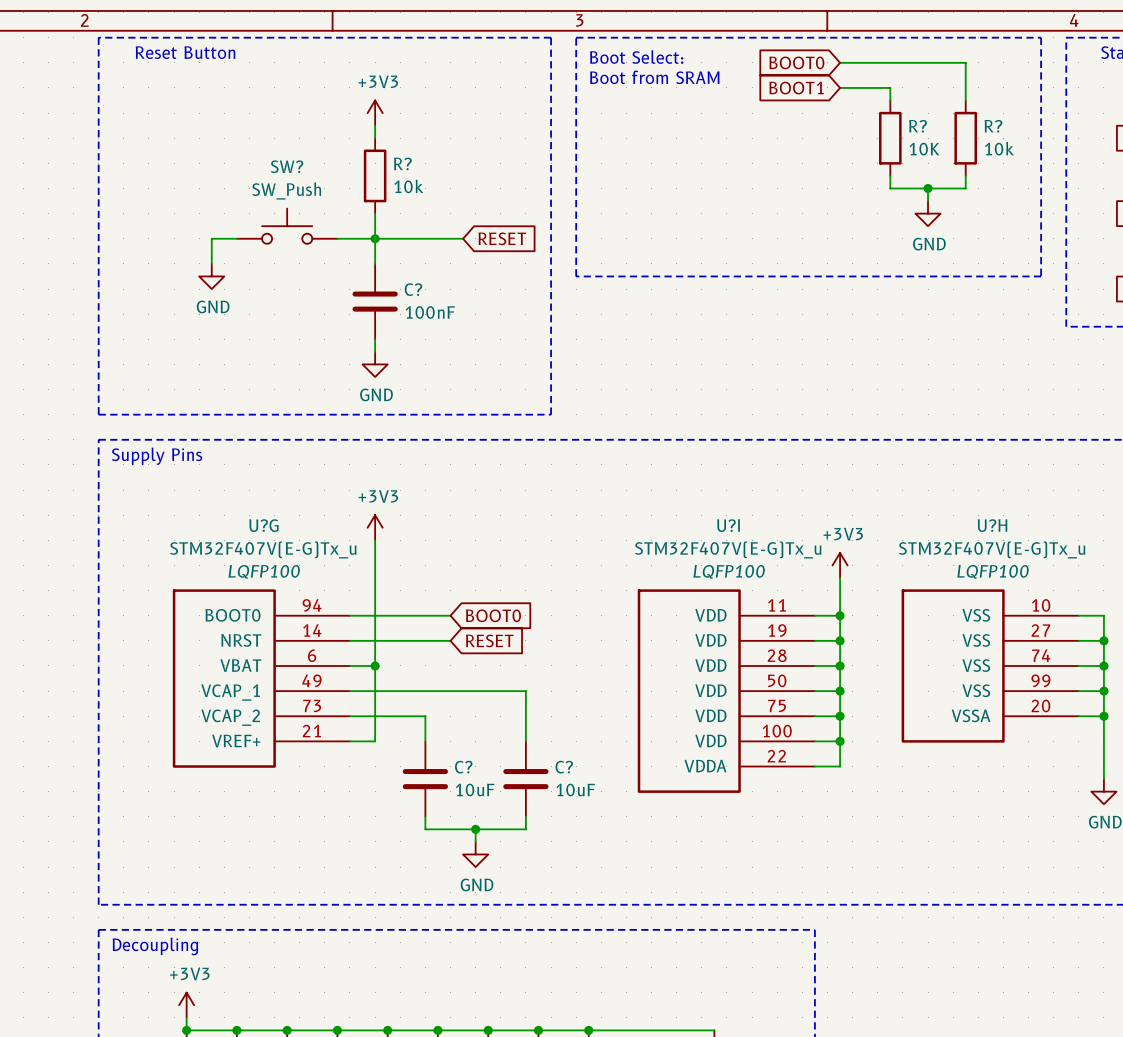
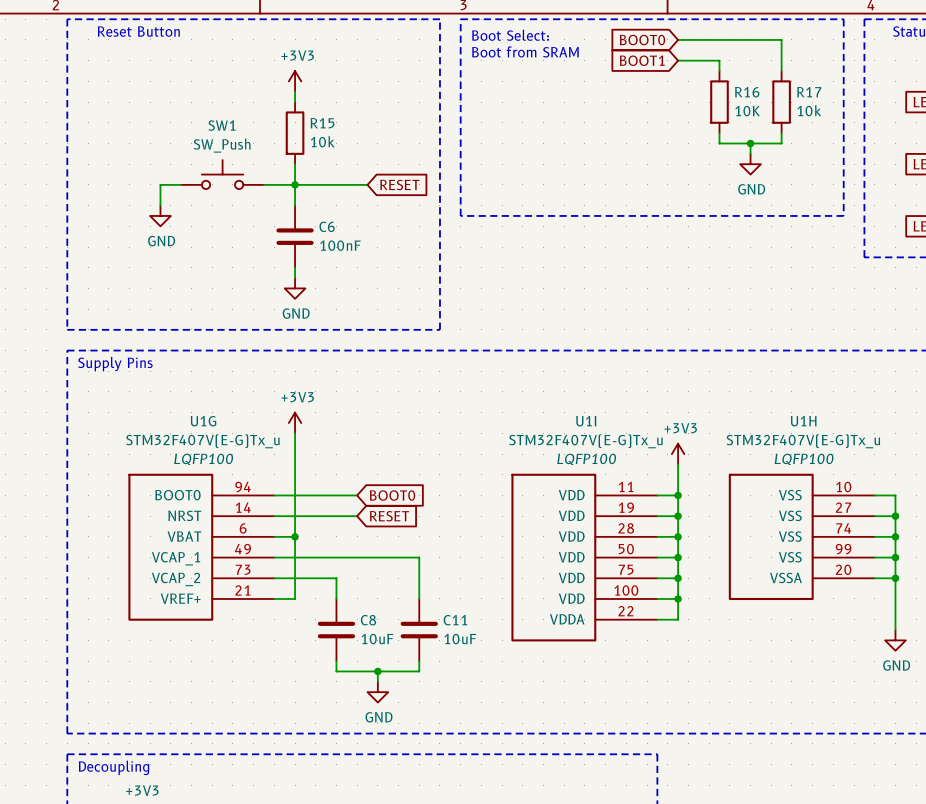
R? name: R? (918, 126) -> R16 (747, 92)
R? name: R? (993, 126) -> R17 (809, 92)
R? name: R? (402, 163) -> R15 (322, 123)
SW? name: SW? (287, 166) -> SW1 (222, 125)
C? name: C? (413, 289) -> C6 (327, 226)
U?G name: U?G (263, 525) -> U1G (203, 421)
U?I name: U?I (728, 525) -> U1I (586, 421)
U?H name: U?H (992, 525) -> U1H (803, 421)
C? name: C? (463, 767) -> C8 (368, 620)
C? name: C? (564, 767) -> C11 (455, 620)

